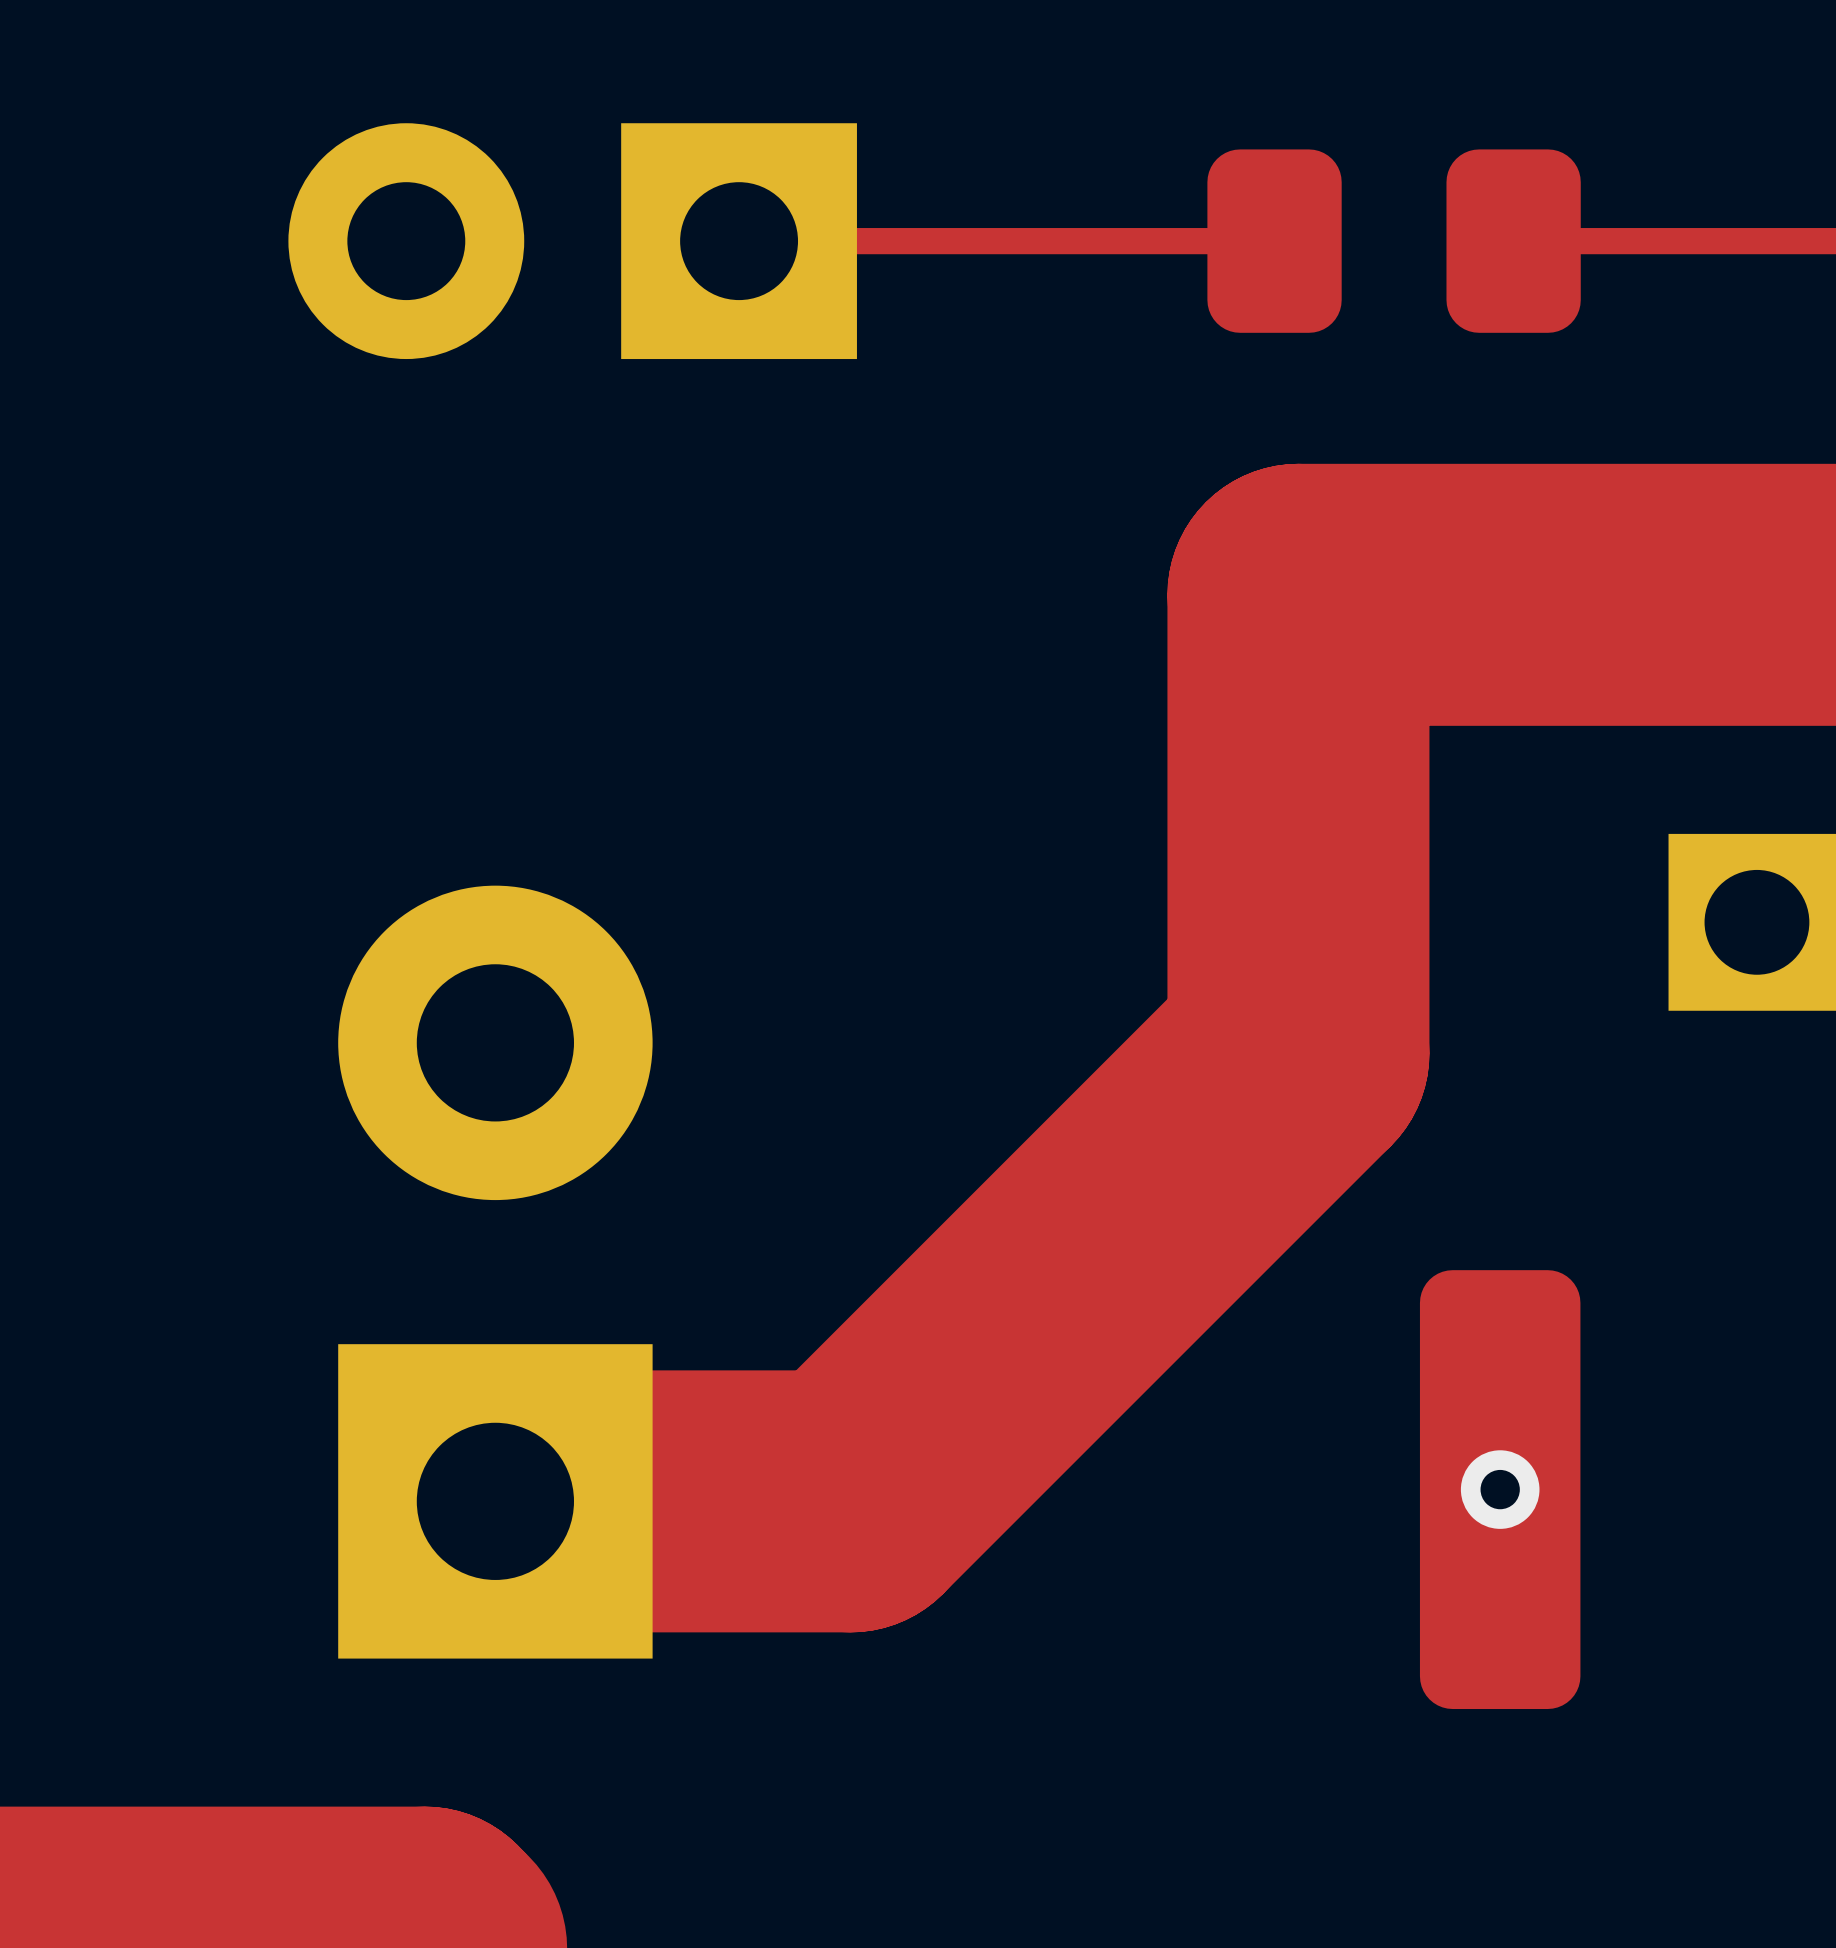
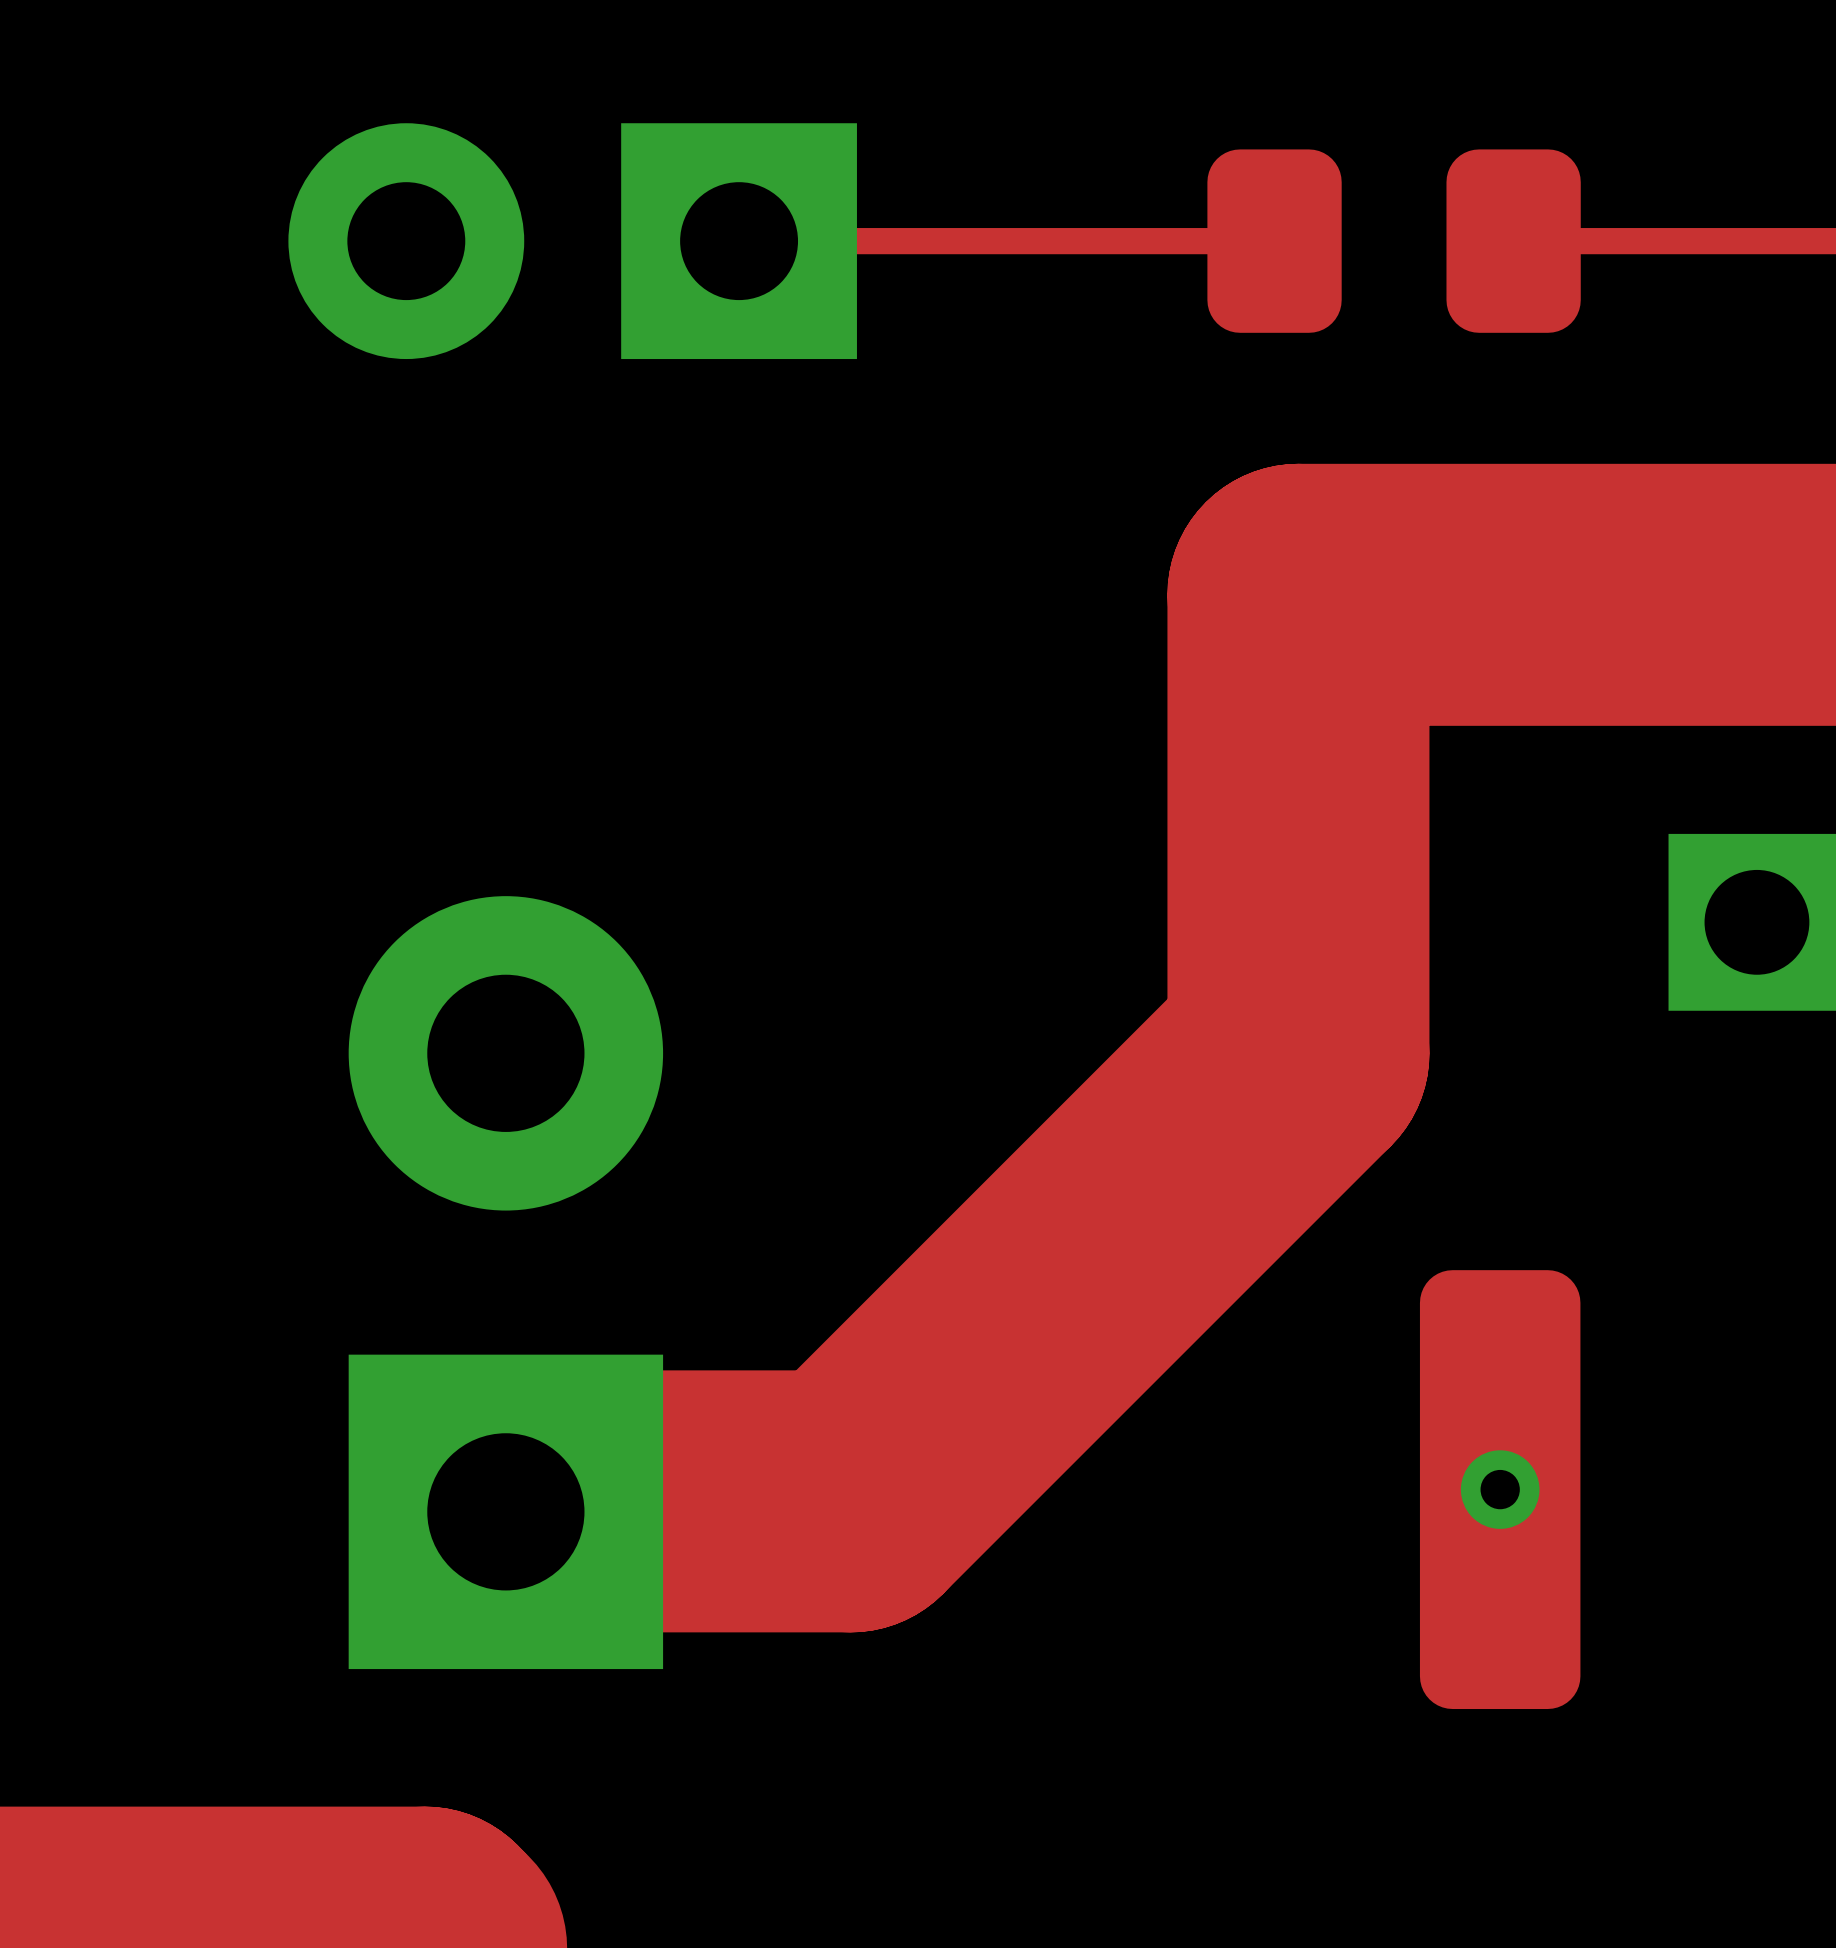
part position: (495, 1272) -> (505, 1282)

